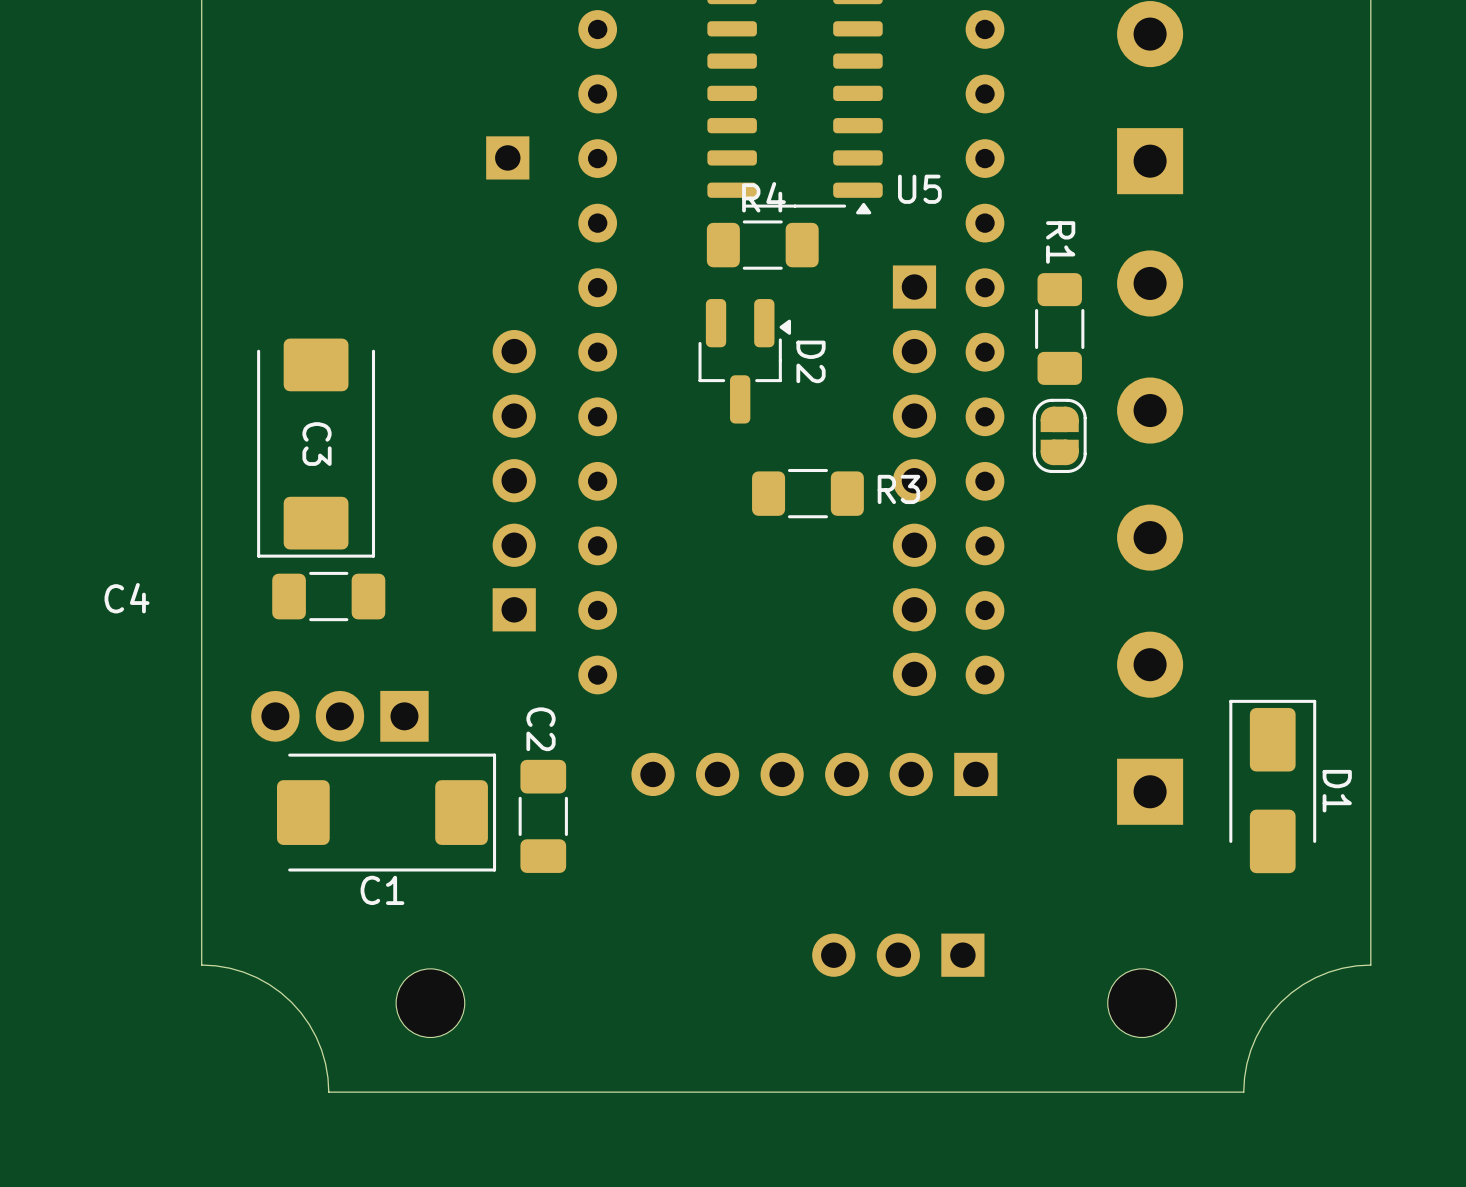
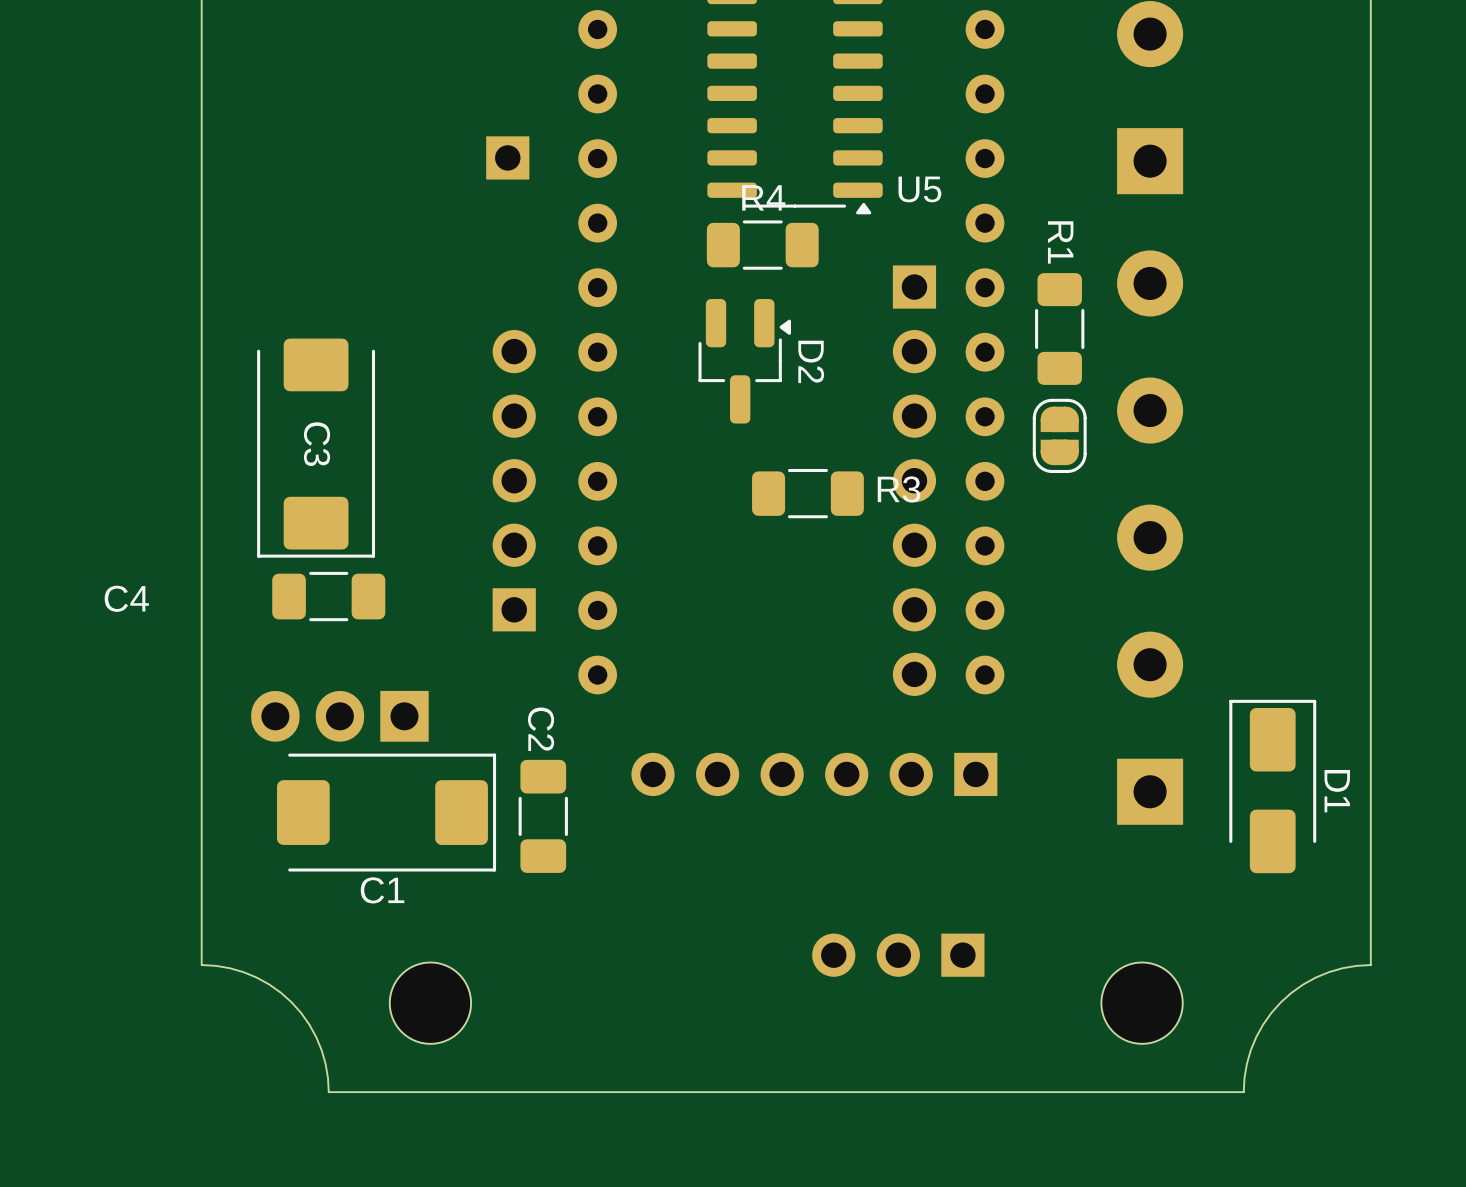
part footprint: [396, 968, 465, 1038] -> [389, 962, 472, 1044]
part footprint: [1107, 968, 1177, 1038] -> [1101, 962, 1183, 1044]

